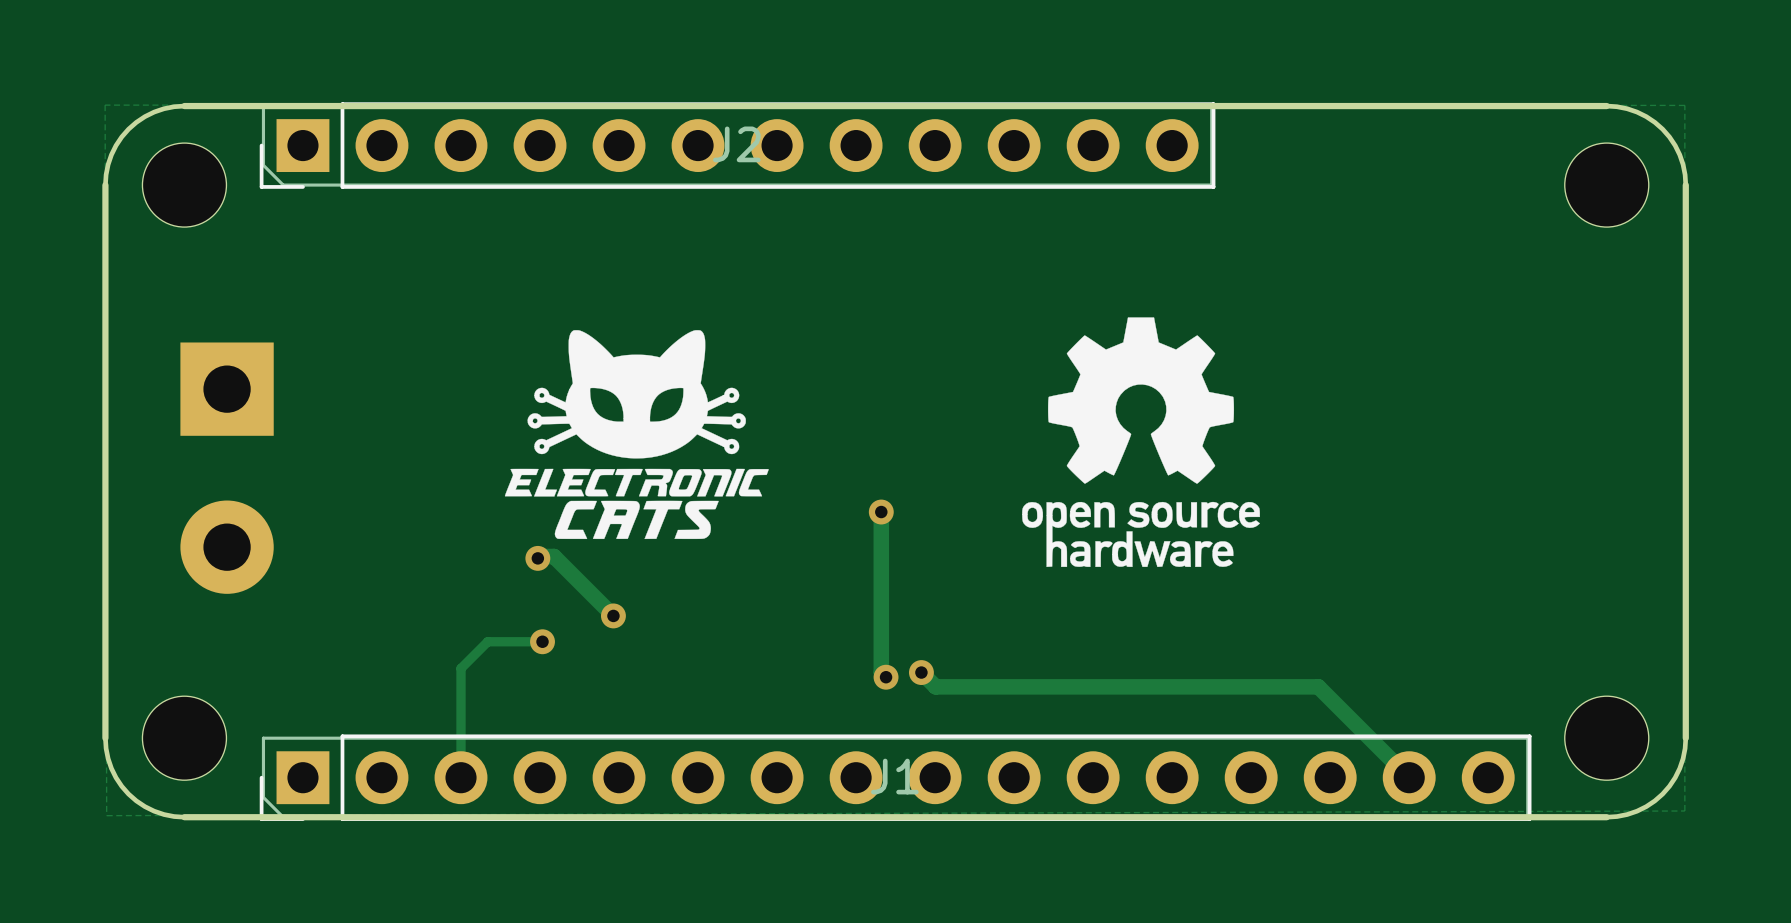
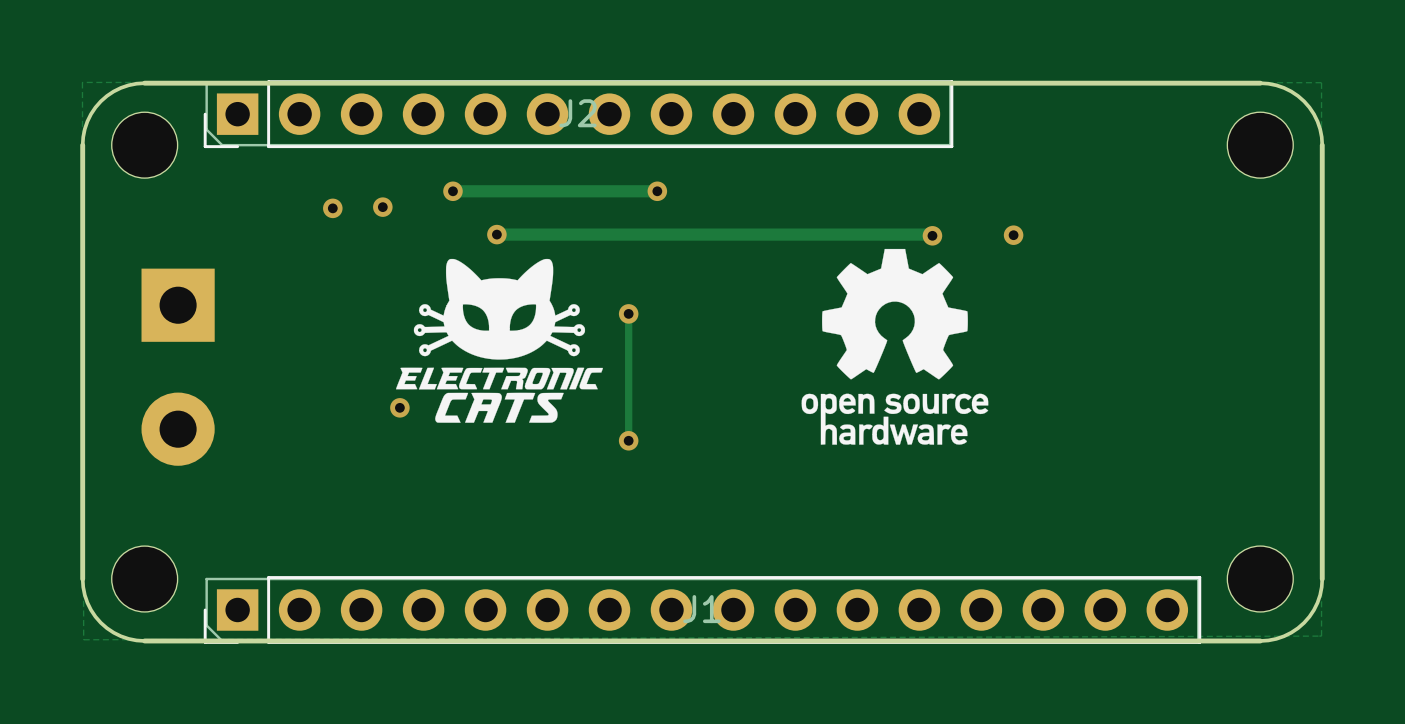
via: none -> (452, 191)
track: none -> (657, 191) (452, 191)
via: none -> (657, 191)
via: none -> (382, 207)
via: none -> (332, 208)
track: none -> (496, 234) (932, 235)
via: none -> (496, 234)
via: none -> (1013, 235)
via: none -> (932, 235)
track: none -> (628, 313) (628, 440)
via: none -> (628, 313)
track: (881, 512) (881, 672) (886, 677) -> none
via: (881, 512) -> none
track: (537, 558) (539, 556) (554, 556) (613, 615) -> none
via position: (537, 558) -> (399, 407)
via: none -> (628, 440)
via: (613, 615) -> none
track: (542, 641) (487, 641) (461, 668) (461, 777) -> none
via: (542, 641) -> none
track: (921, 672) (935, 686) (1318, 686) (1409, 777) -> none
via: (921, 672) -> none
via: (886, 677) -> none

